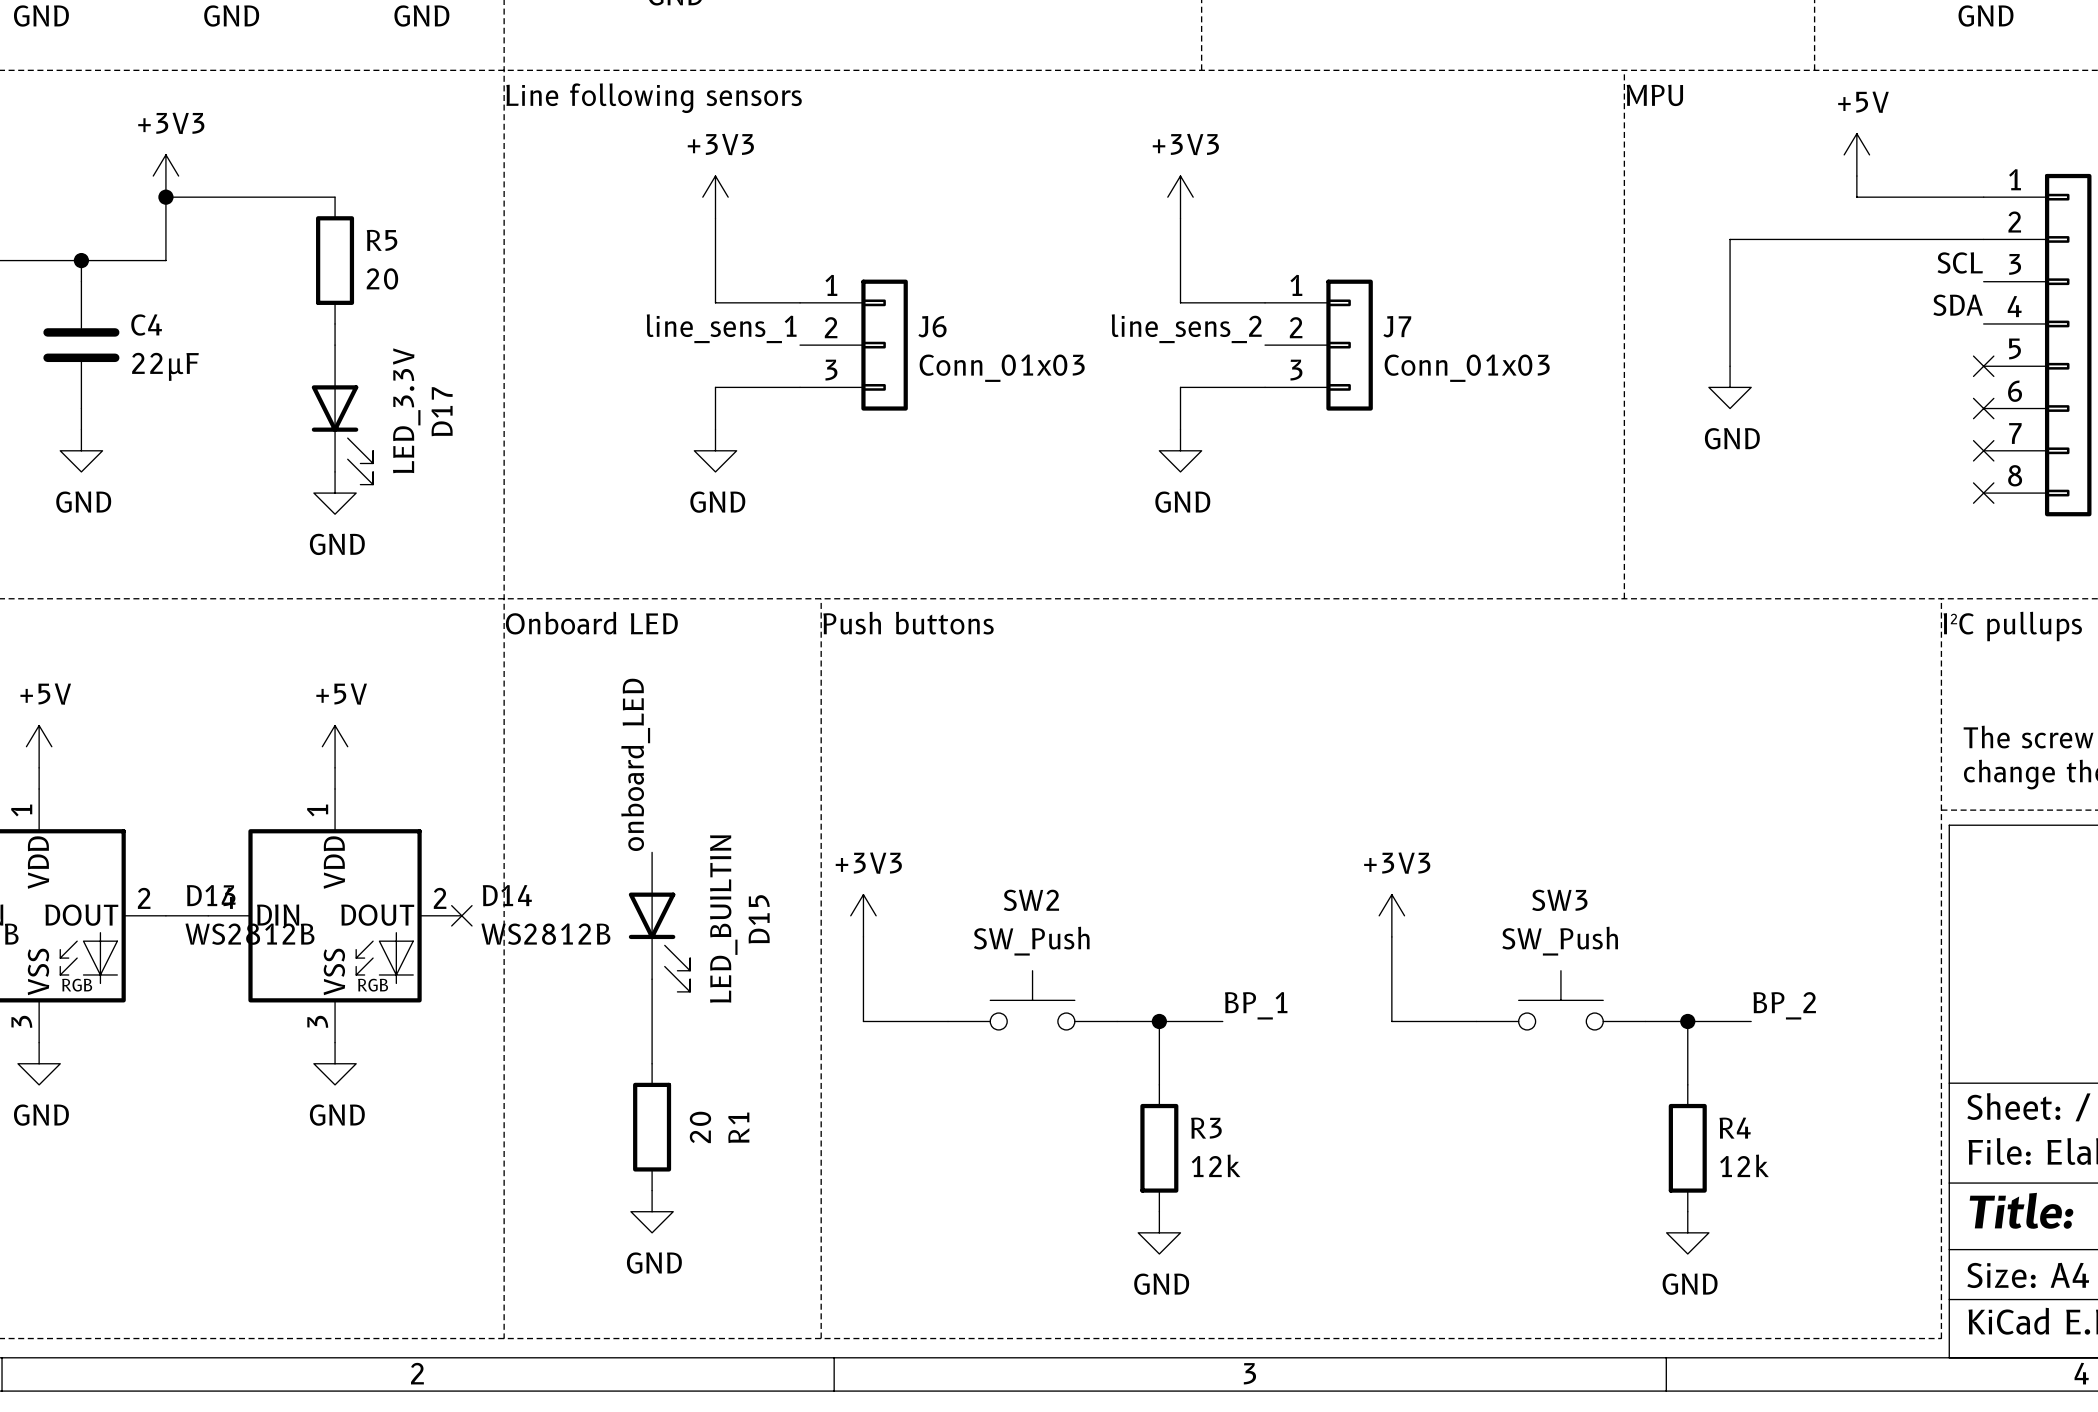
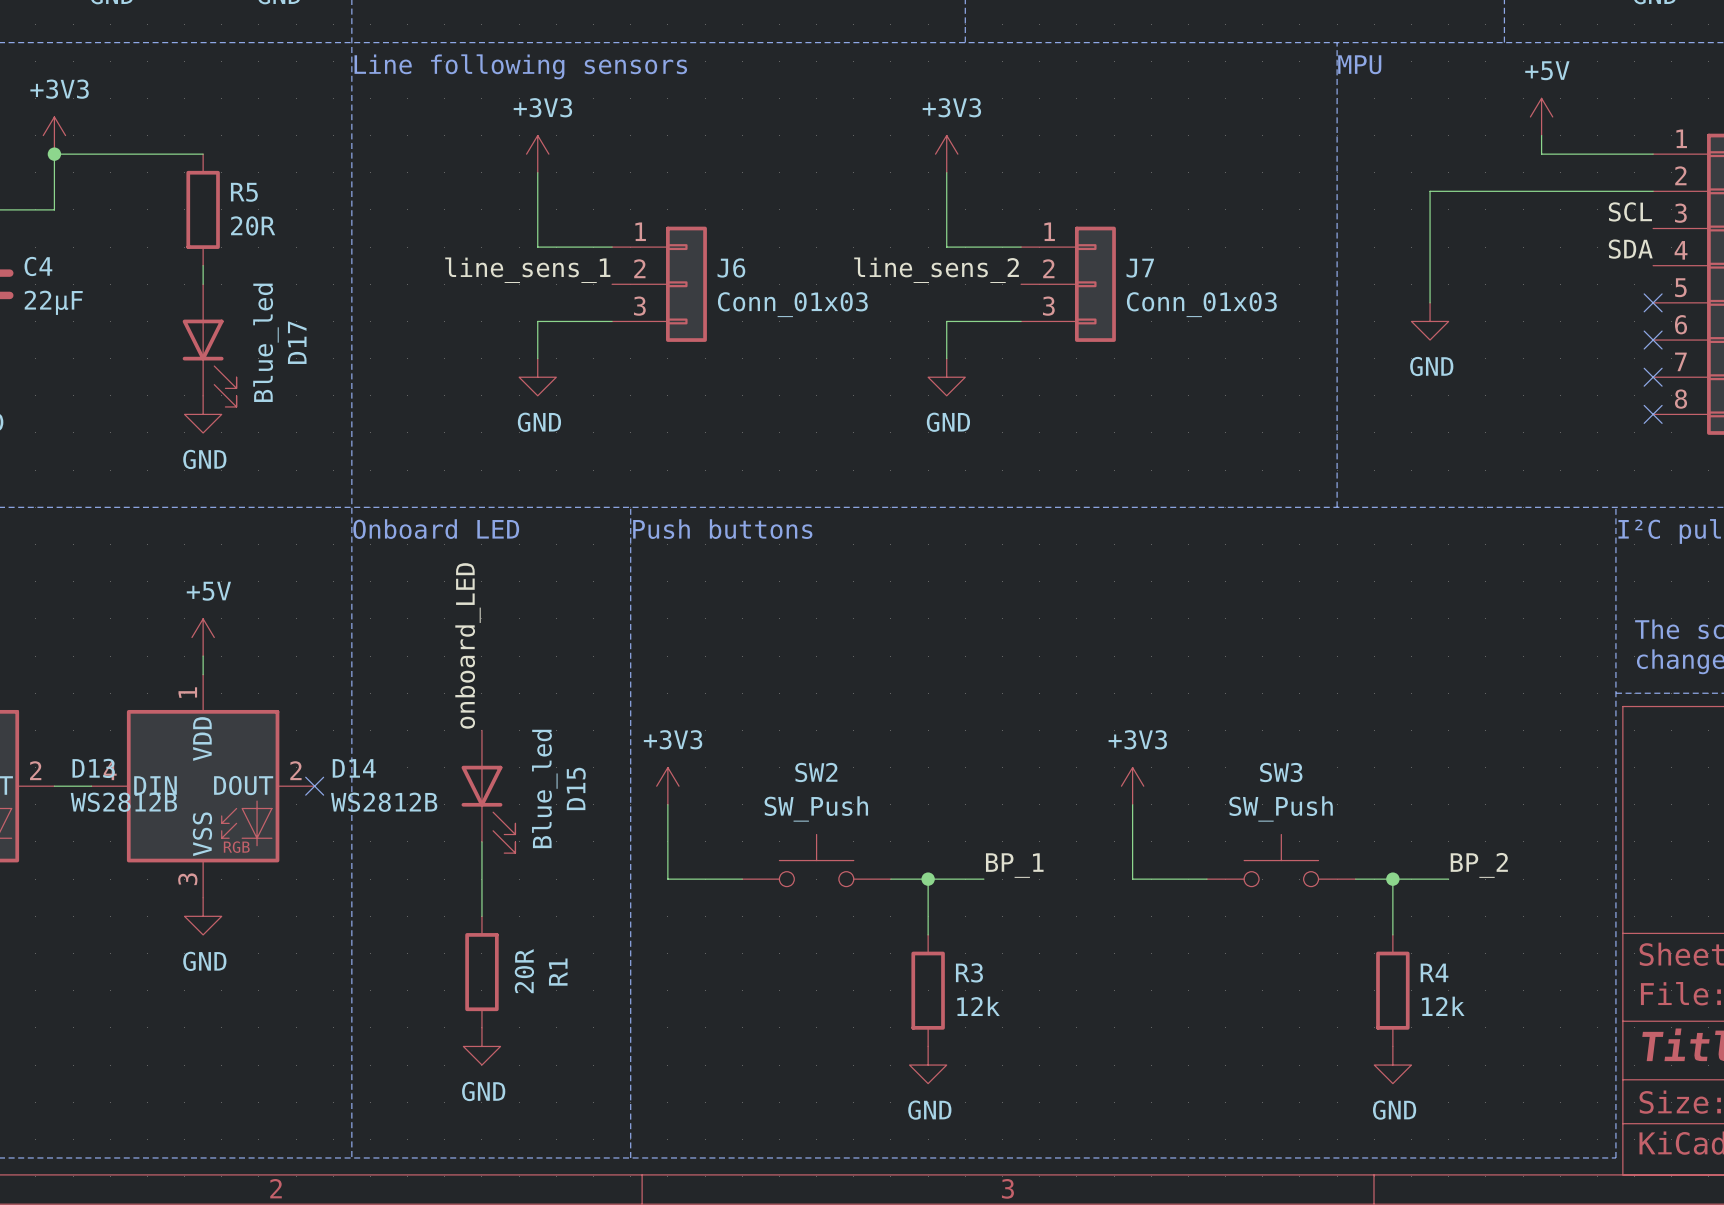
R5 value: 20 (382, 278) -> 20R (253, 225)
D17 value: LED_3.3V (406, 410) -> Blue_led (265, 342)
D15 value: LED_BUILTIN (723, 919) -> Blue_led (544, 788)
R1 value: 20 (700, 1127) -> 20R (524, 971)

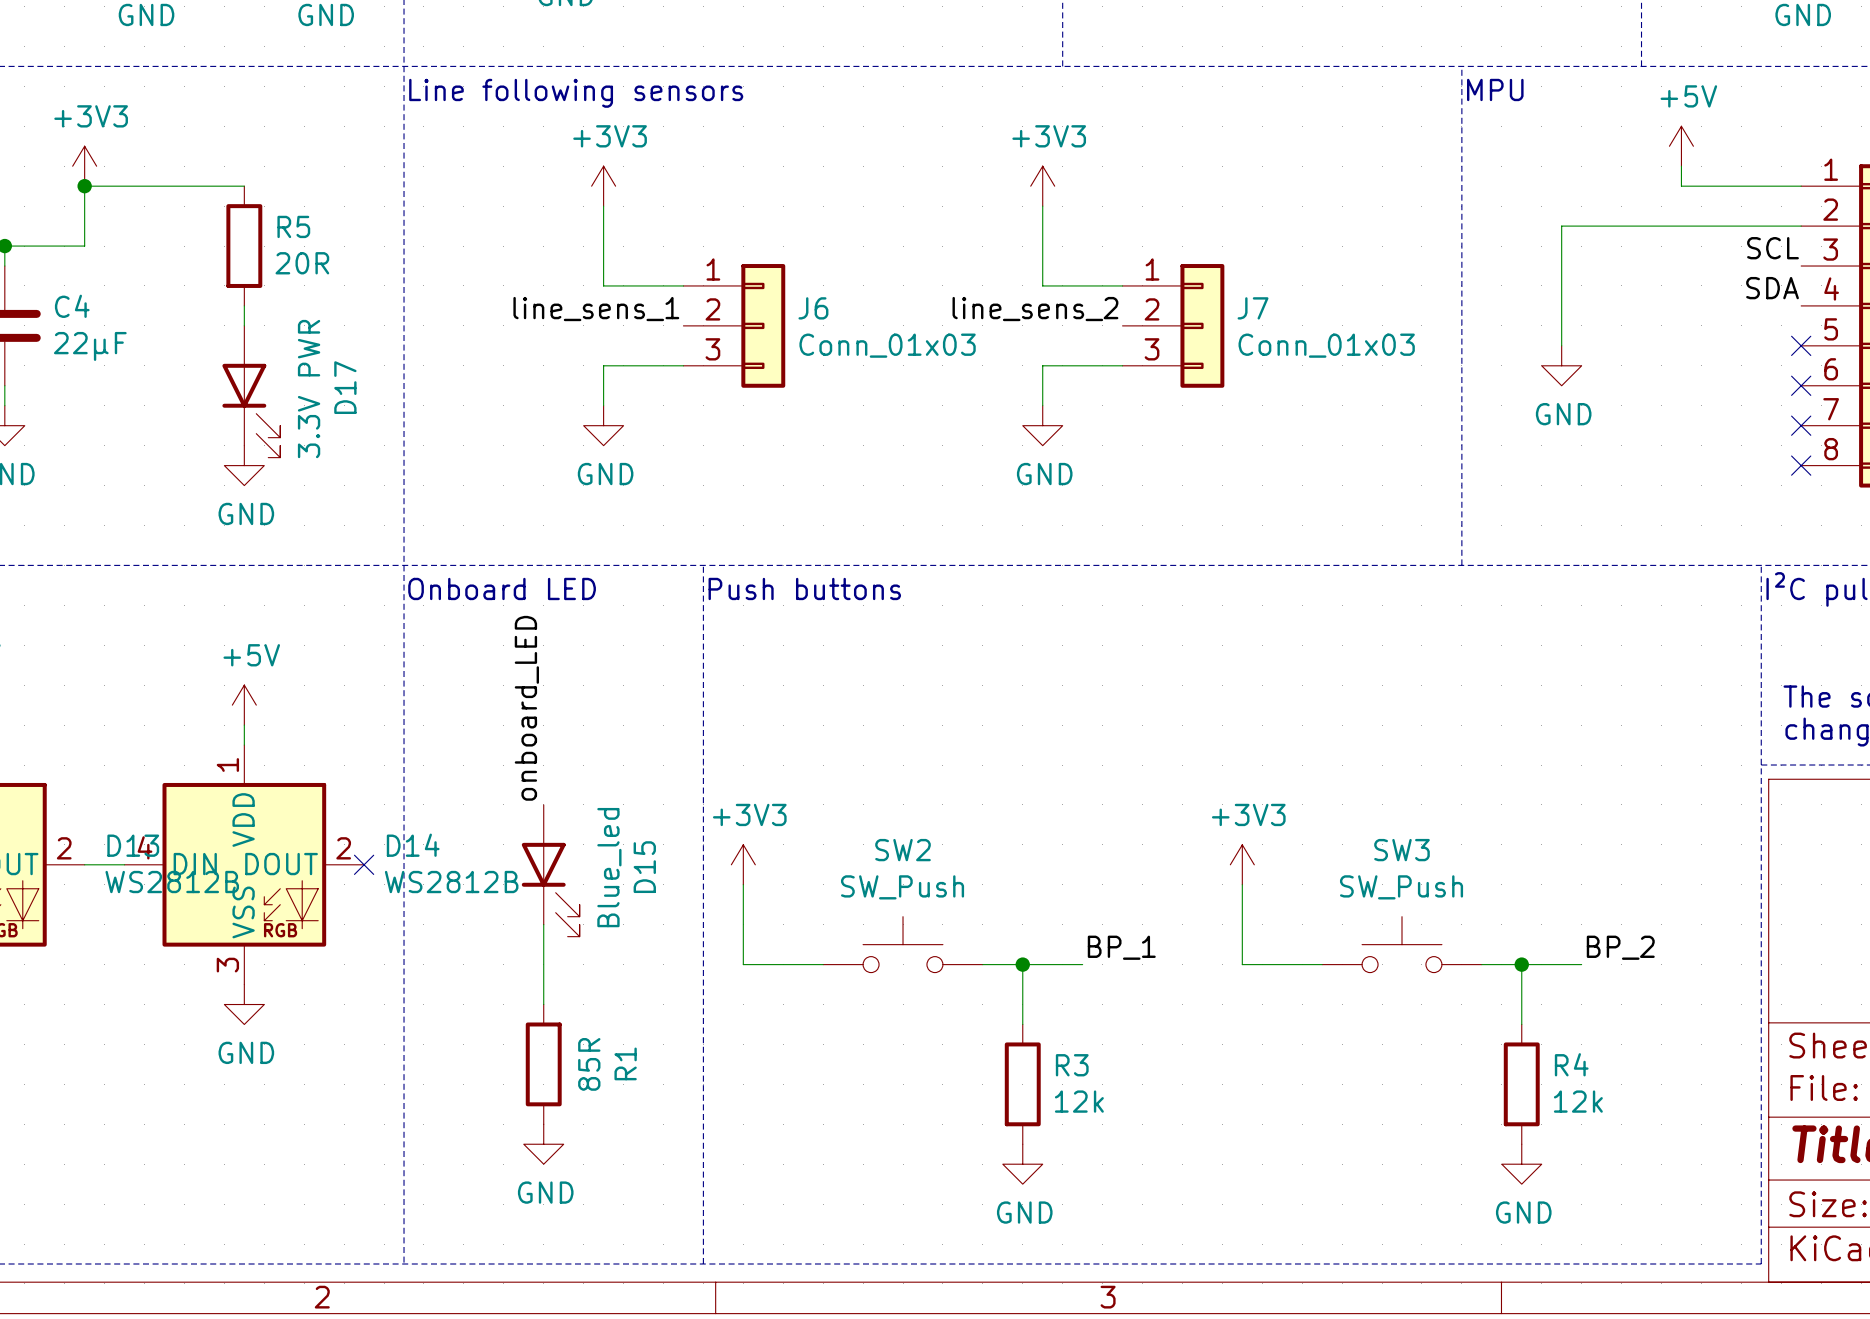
D17 value: Blue_led (265, 342) -> 3.3V PWR (309, 389)
R1 value: 20R (524, 971) -> 85R (589, 1064)

